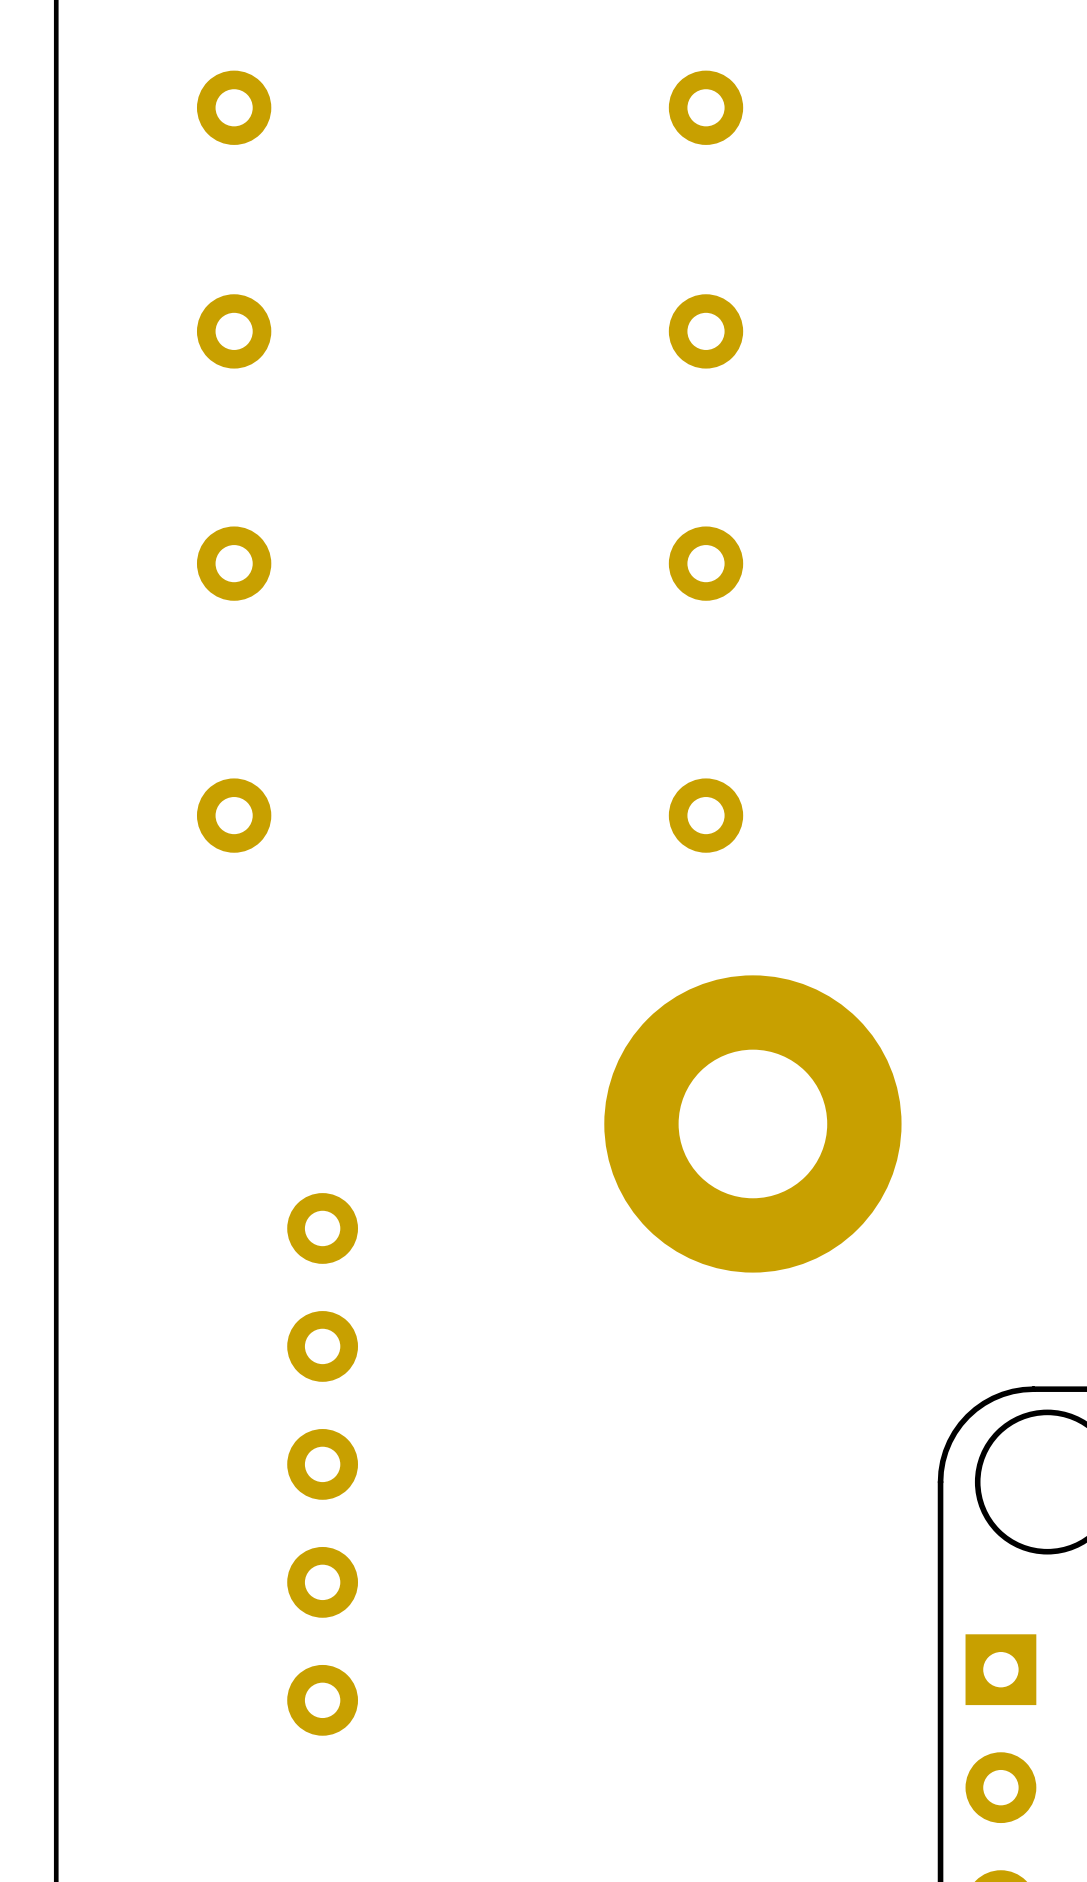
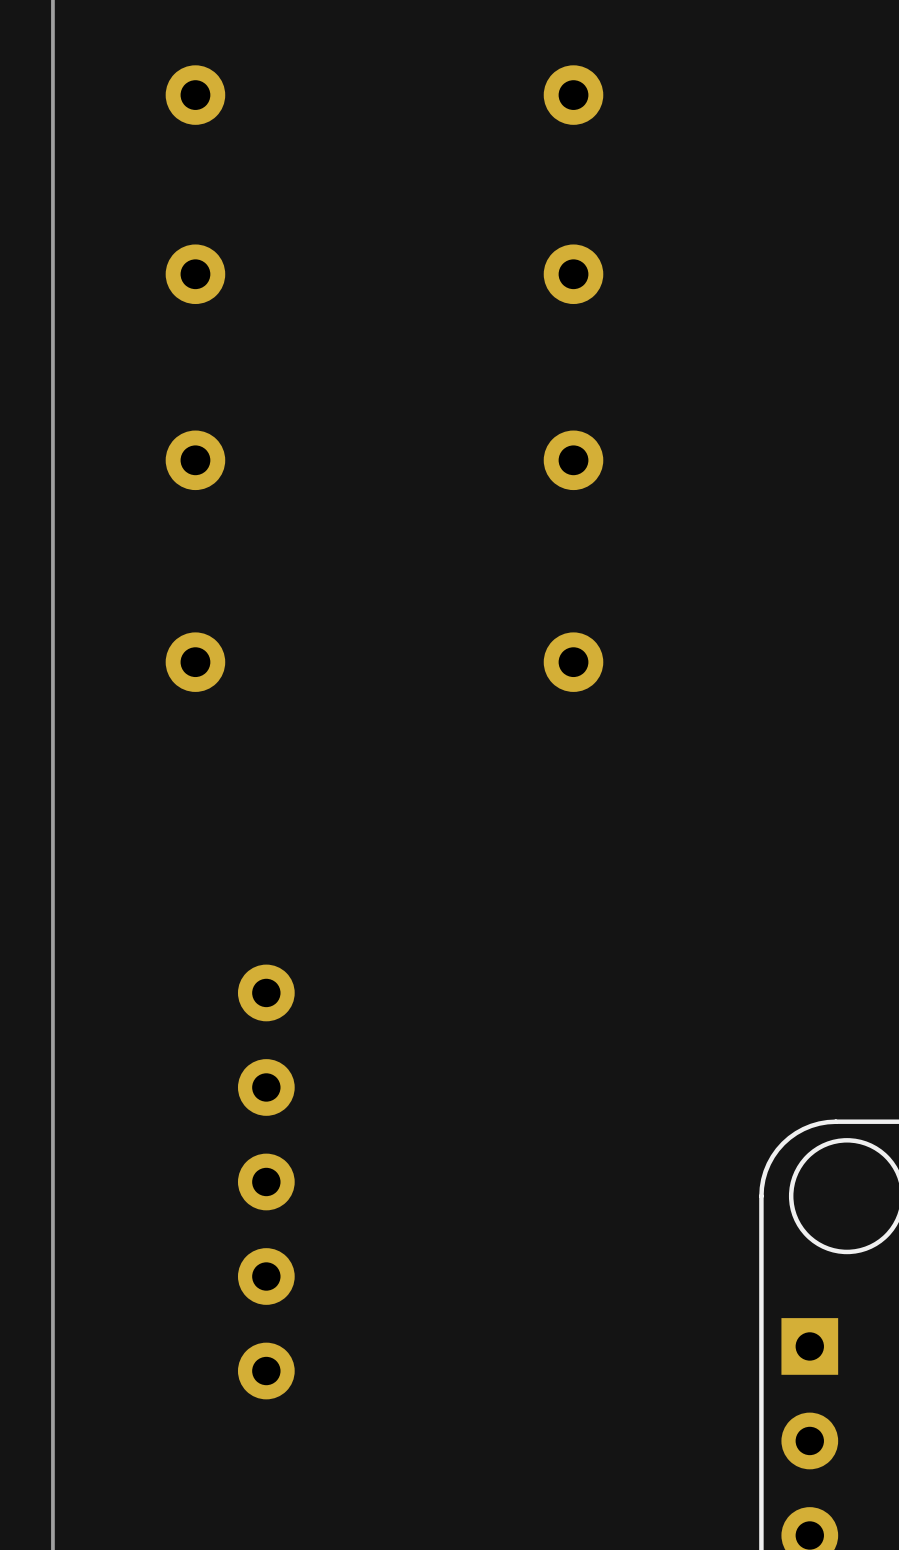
part: (752, 1123) -> none

